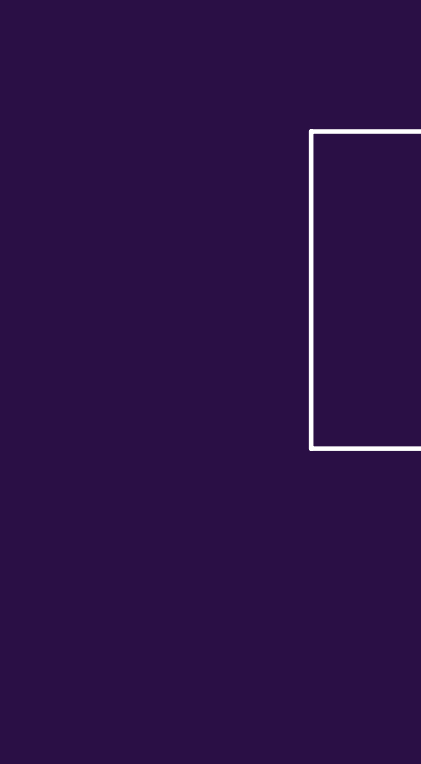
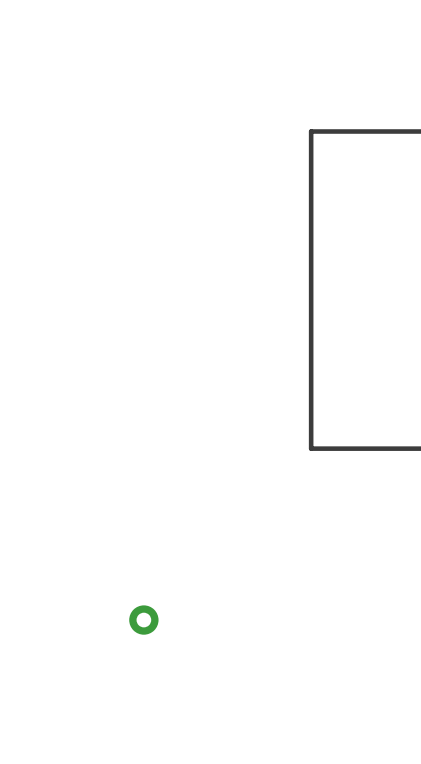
via: none -> (143, 620)

